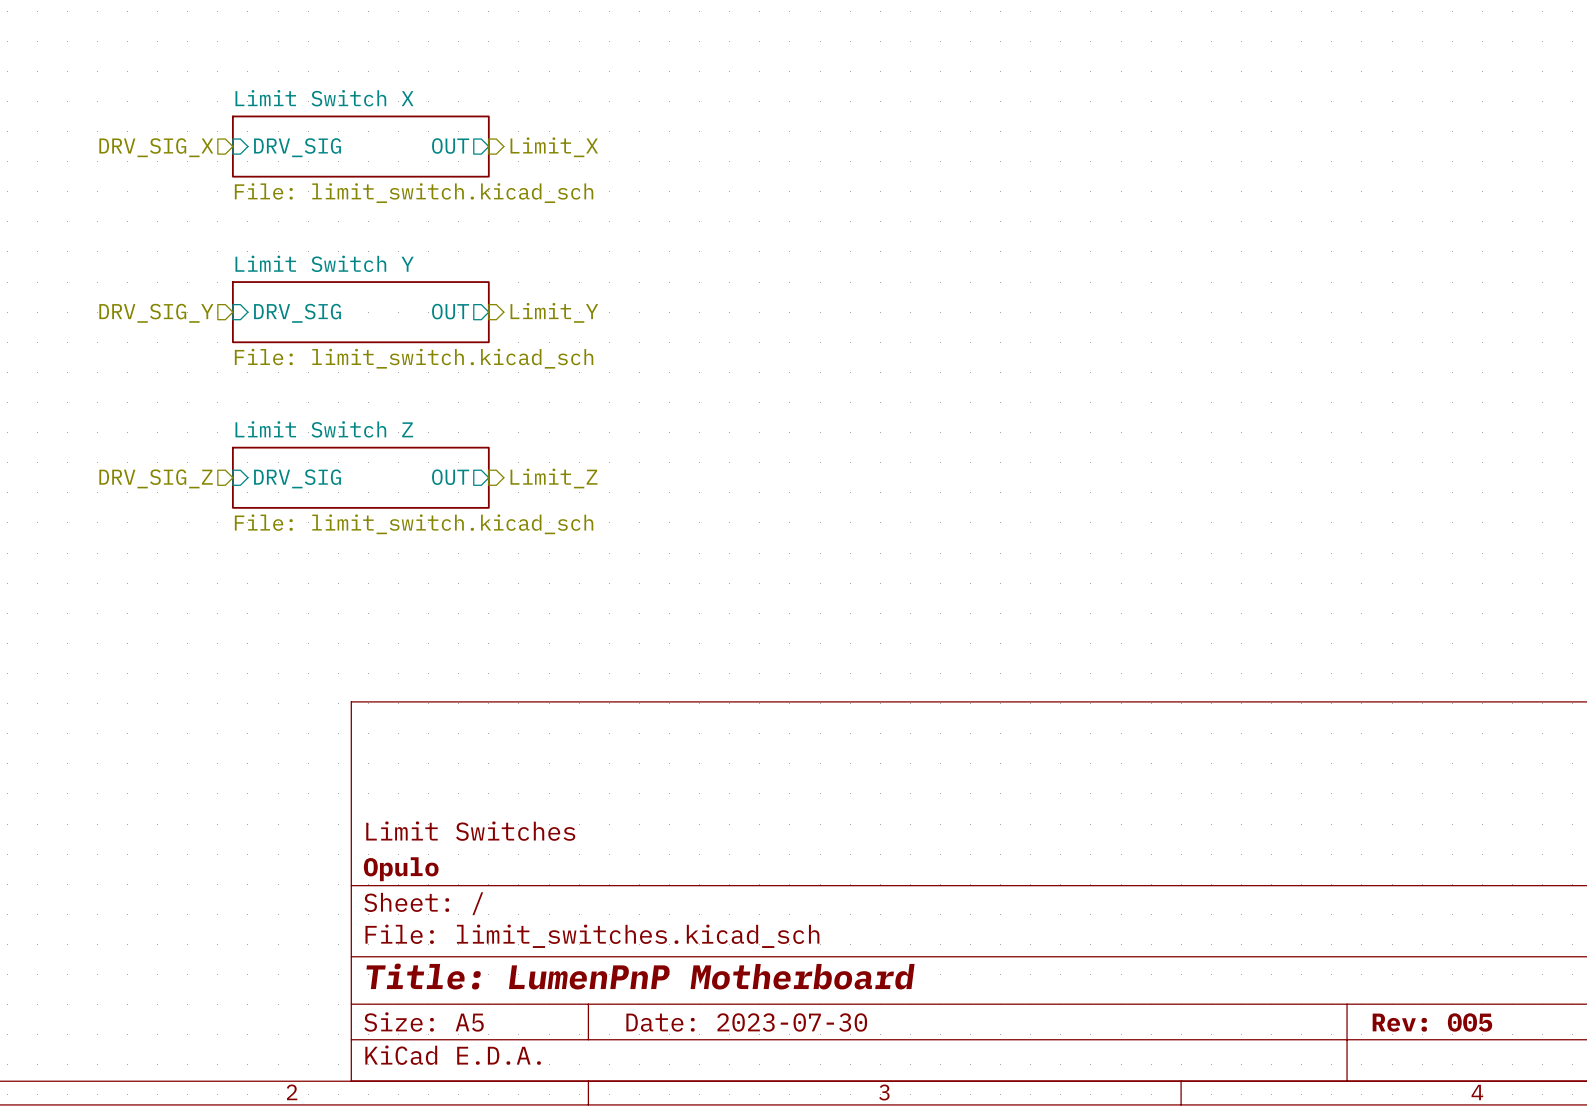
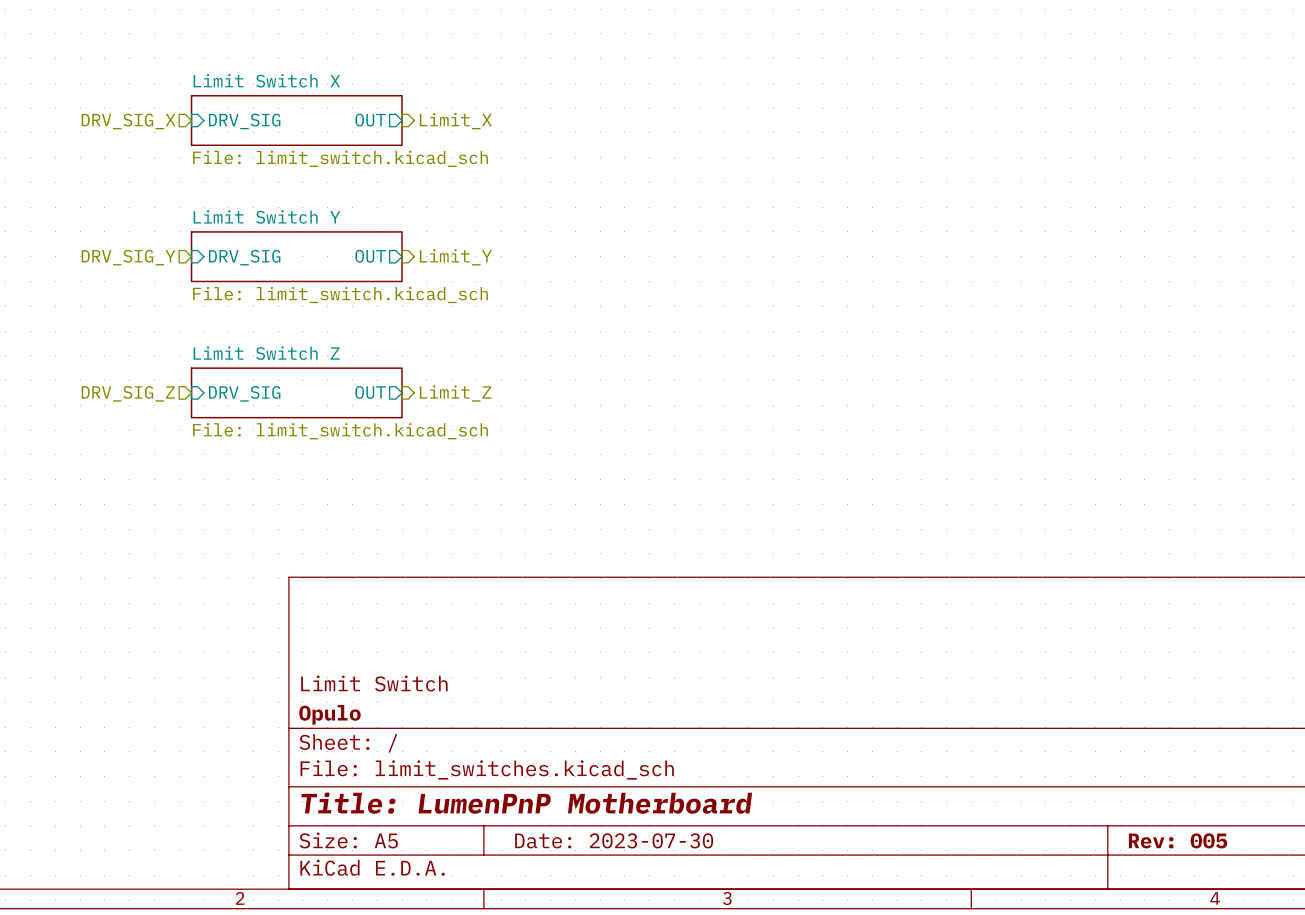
title block: Limit Switches (470, 831) -> Limit Switch (374, 683)

